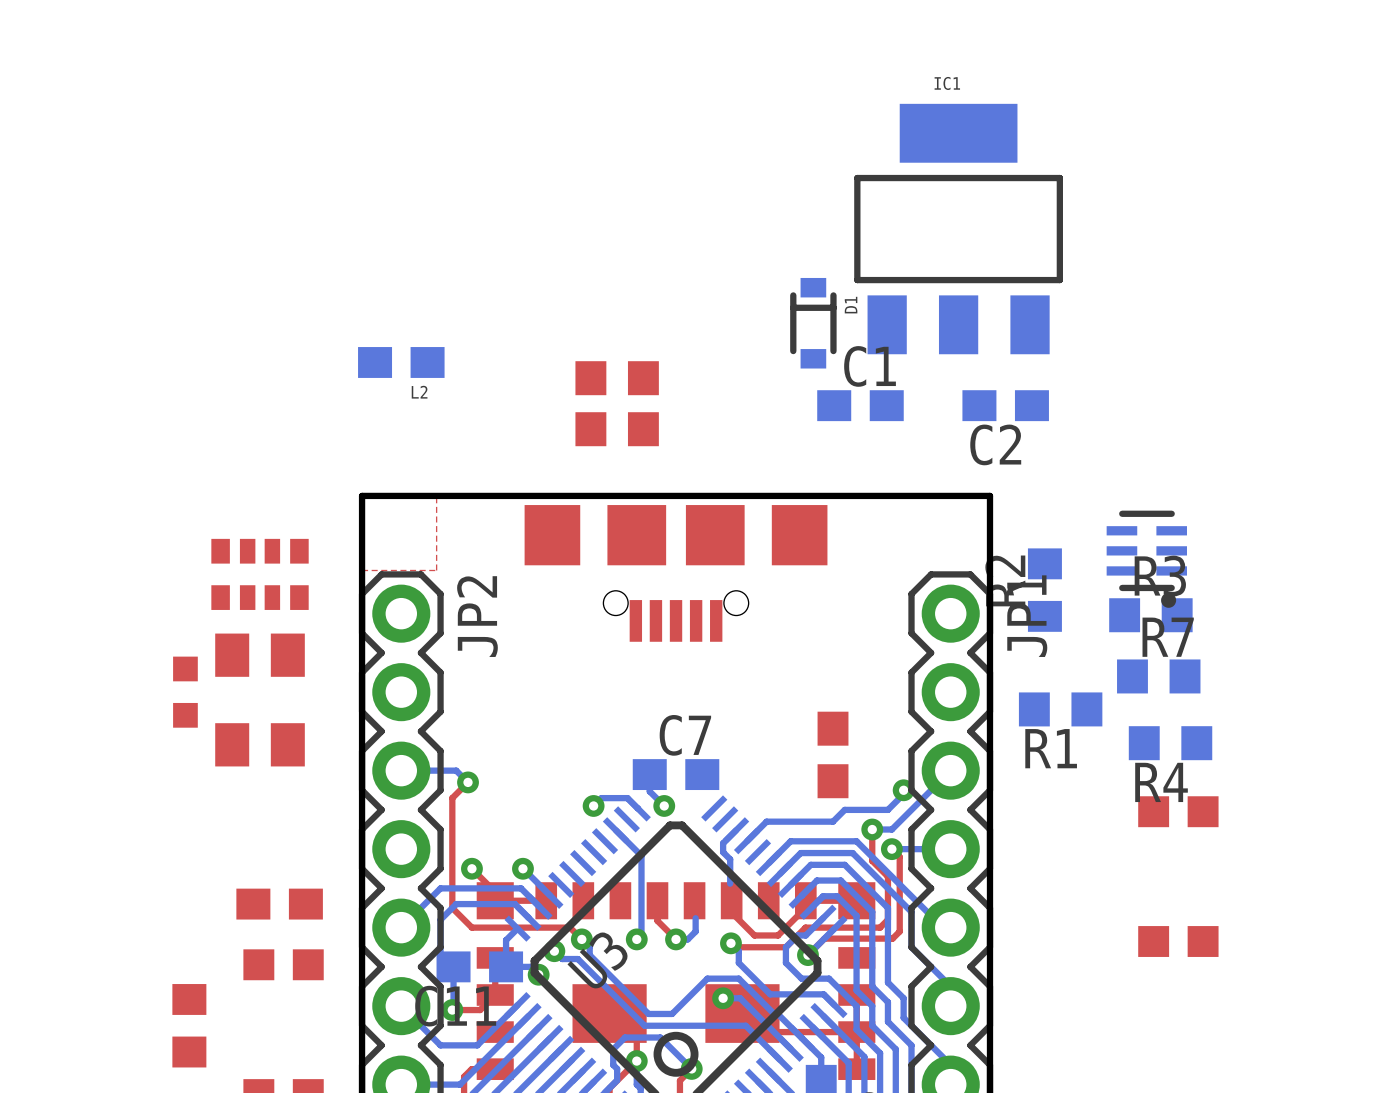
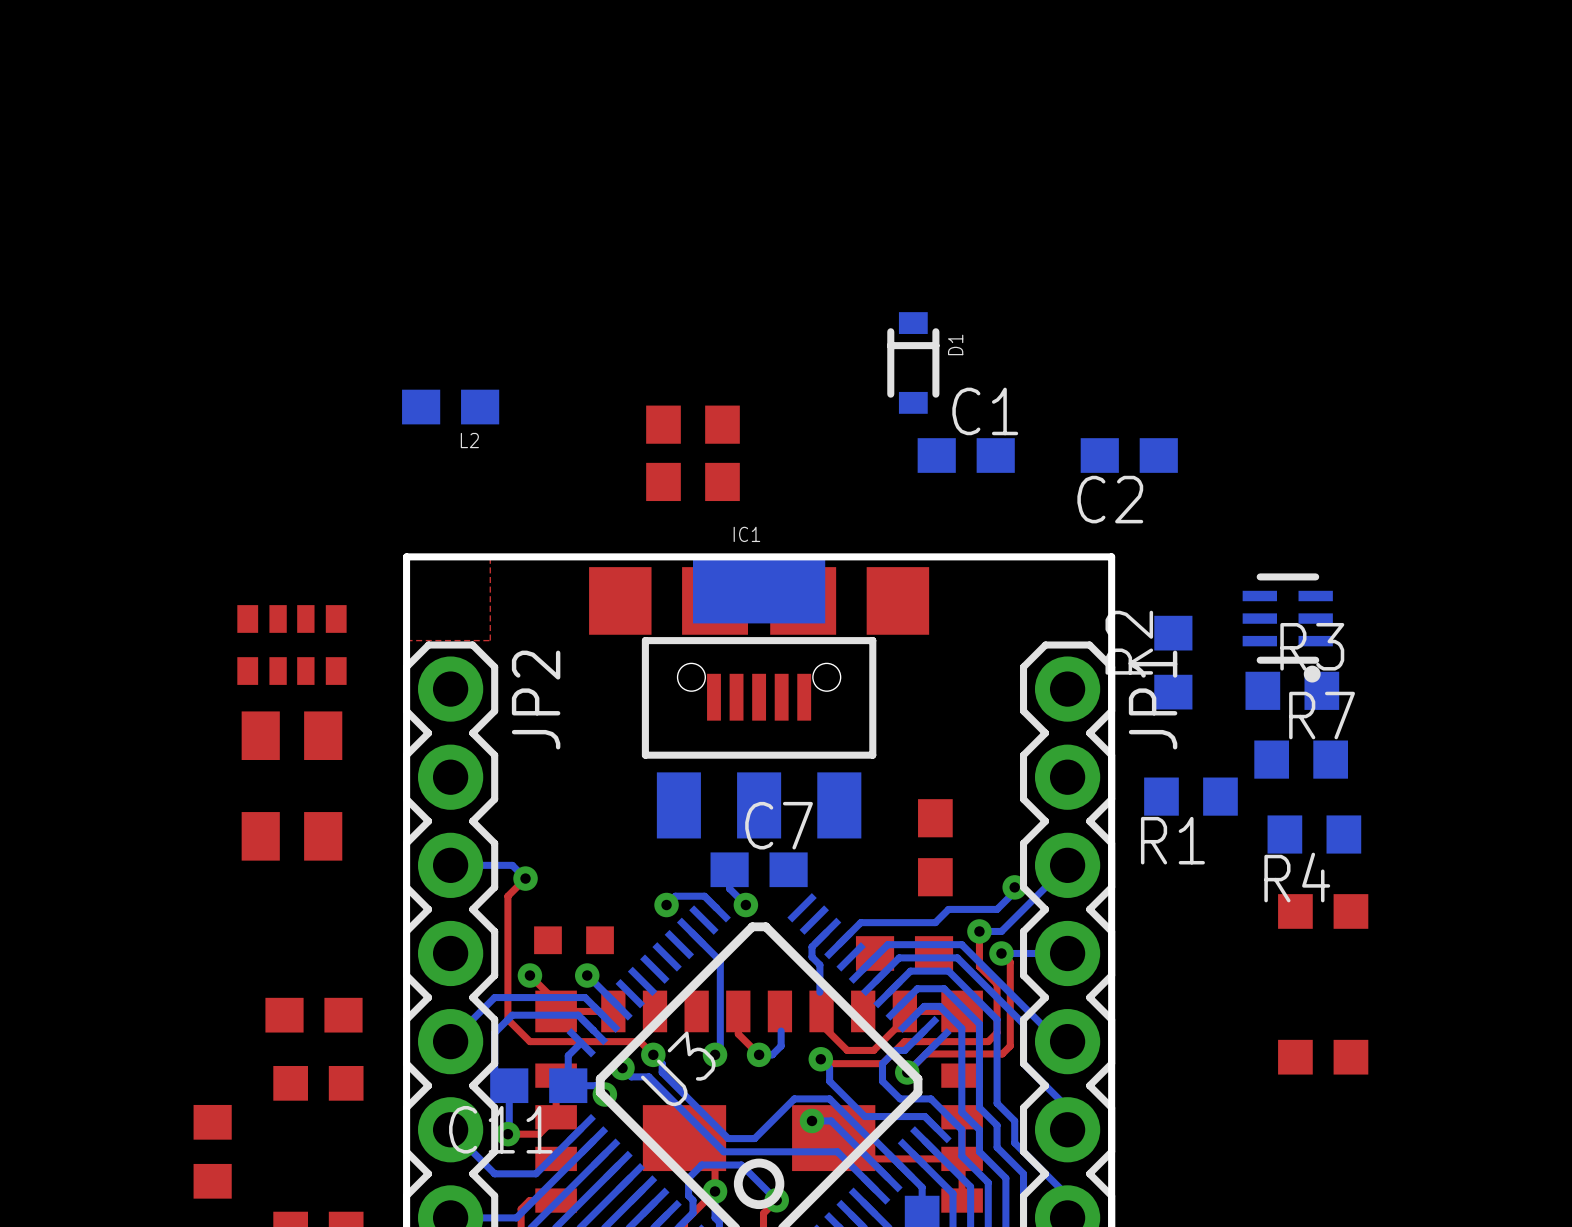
IC1 position: (958, 229) -> (759, 697)
part rotation: 0° (185, 692) -> 90° clockwise (574, 940)
part position: (185, 692) -> (574, 940)
part: none -> (904, 953)

